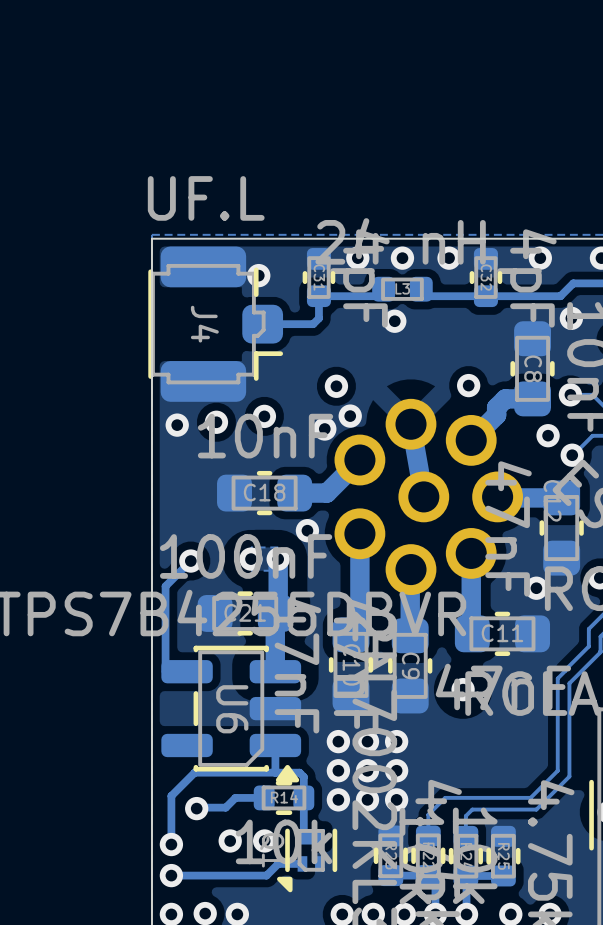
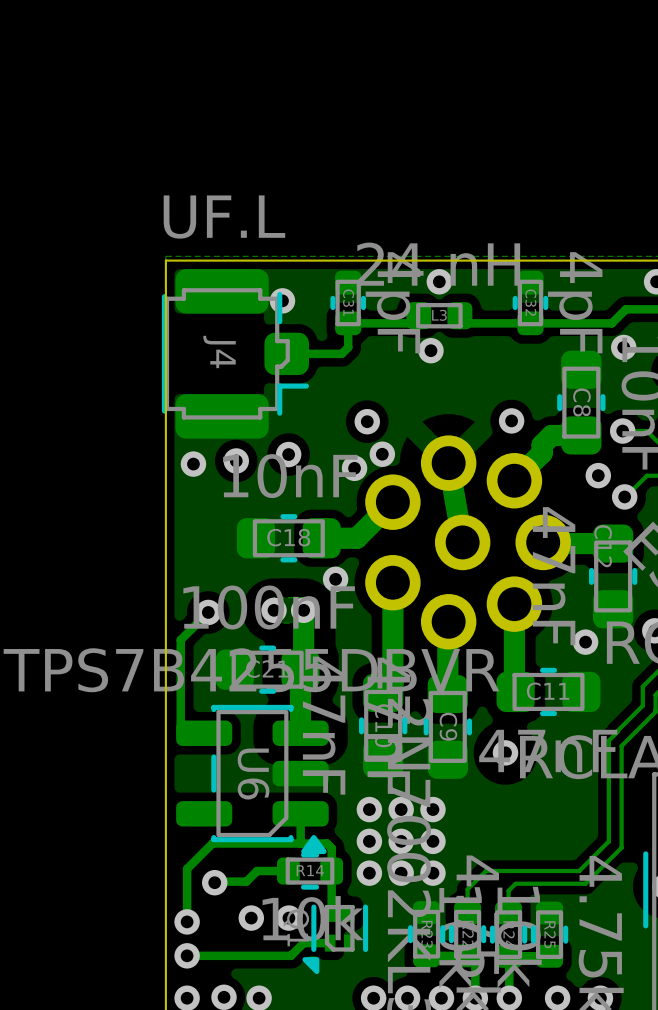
via: (357, 258) -> none
via: (449, 258) -> none
via: (540, 258) -> none

